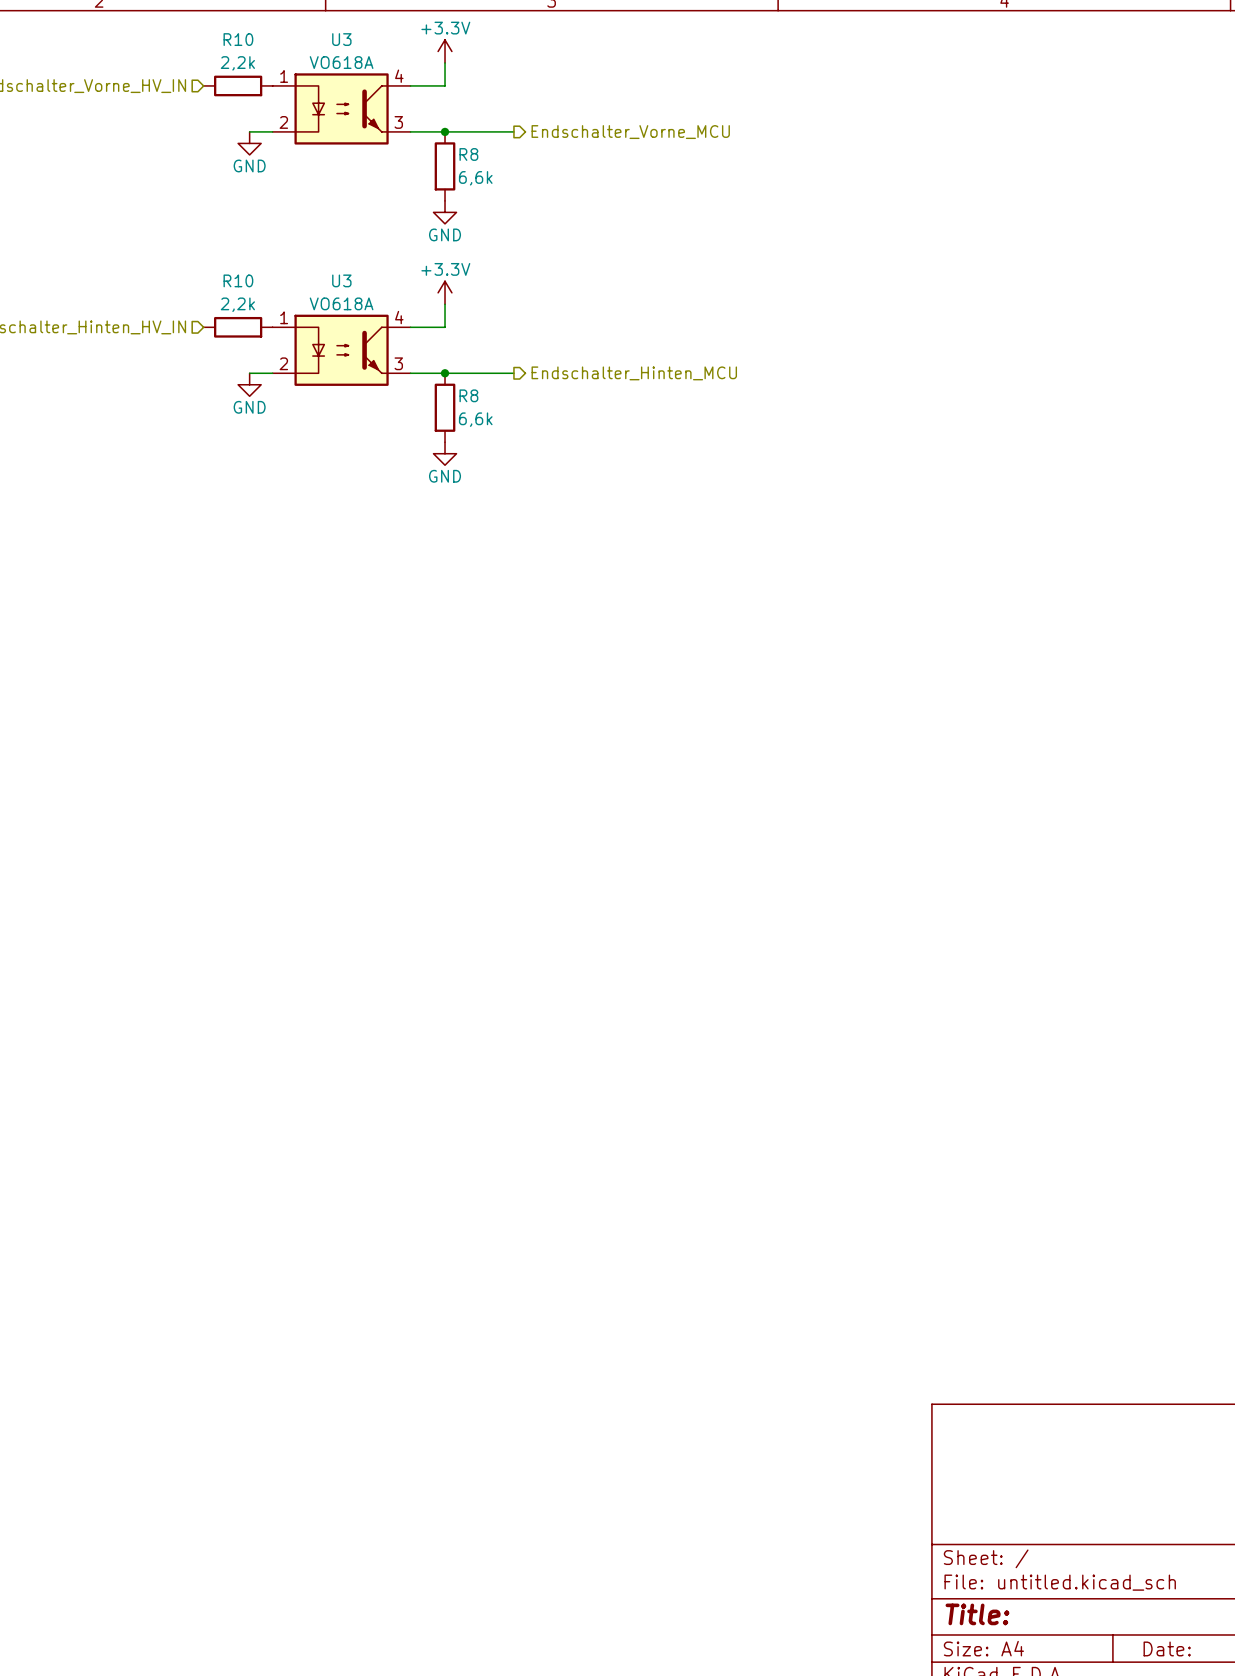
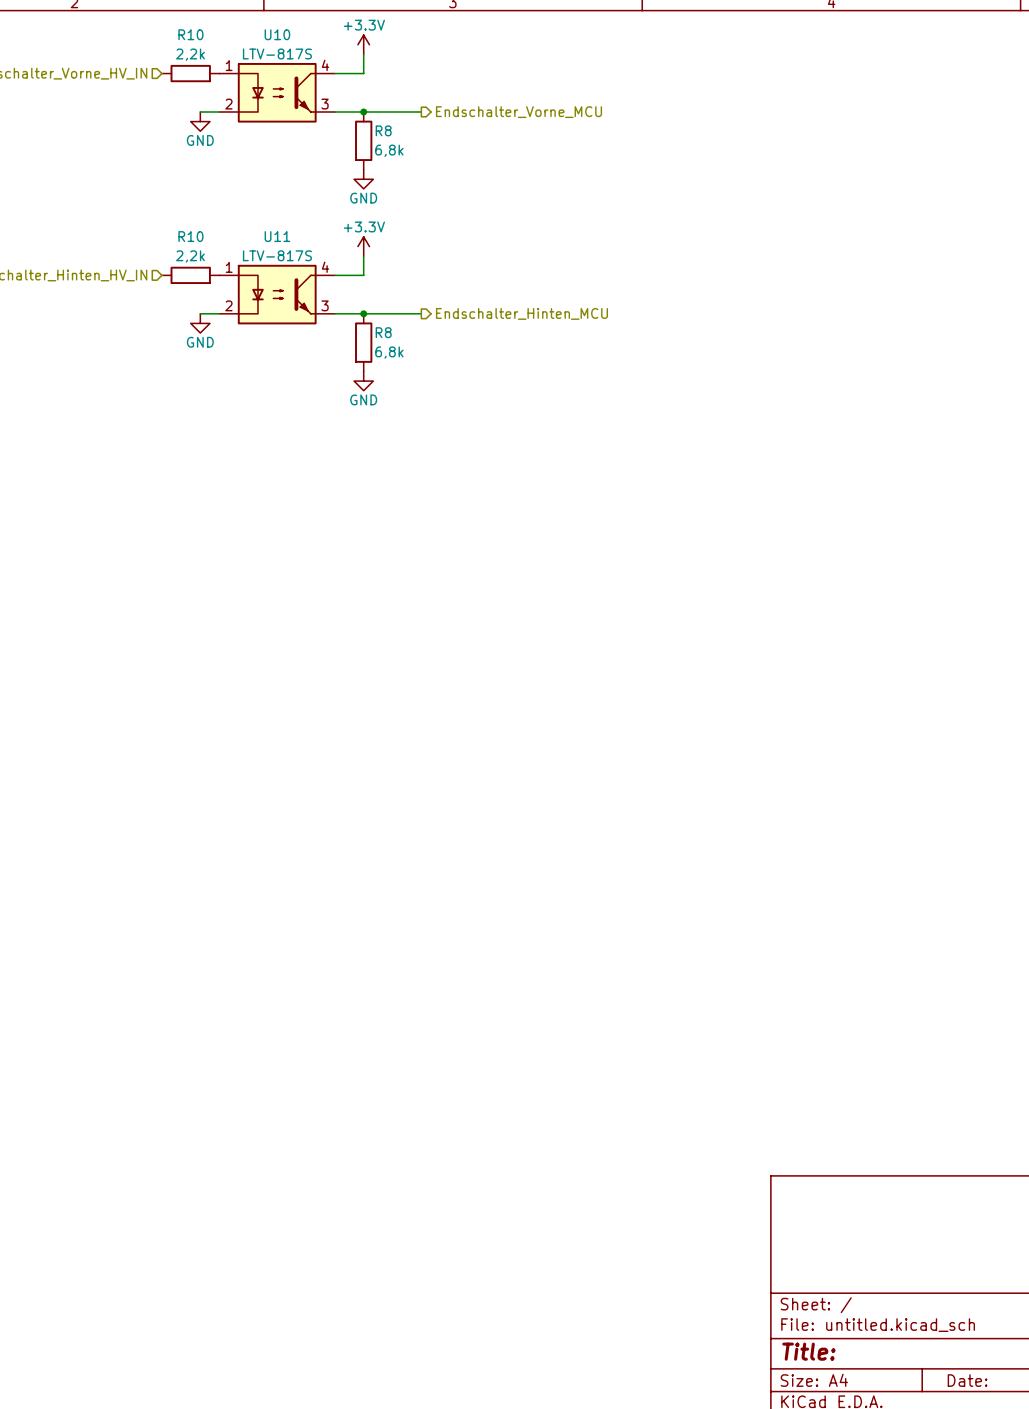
U3: VO618A (341, 108) -> none
U10: none -> LTV-817S (277, 92)
R8 value: 6,6k (475, 178) -> 6,8k (389, 150)
U3: VO618A (341, 350) -> none
U11: none -> LTV-817S (277, 294)
R8 value: 6,6k (475, 419) -> 6,8k (389, 352)

